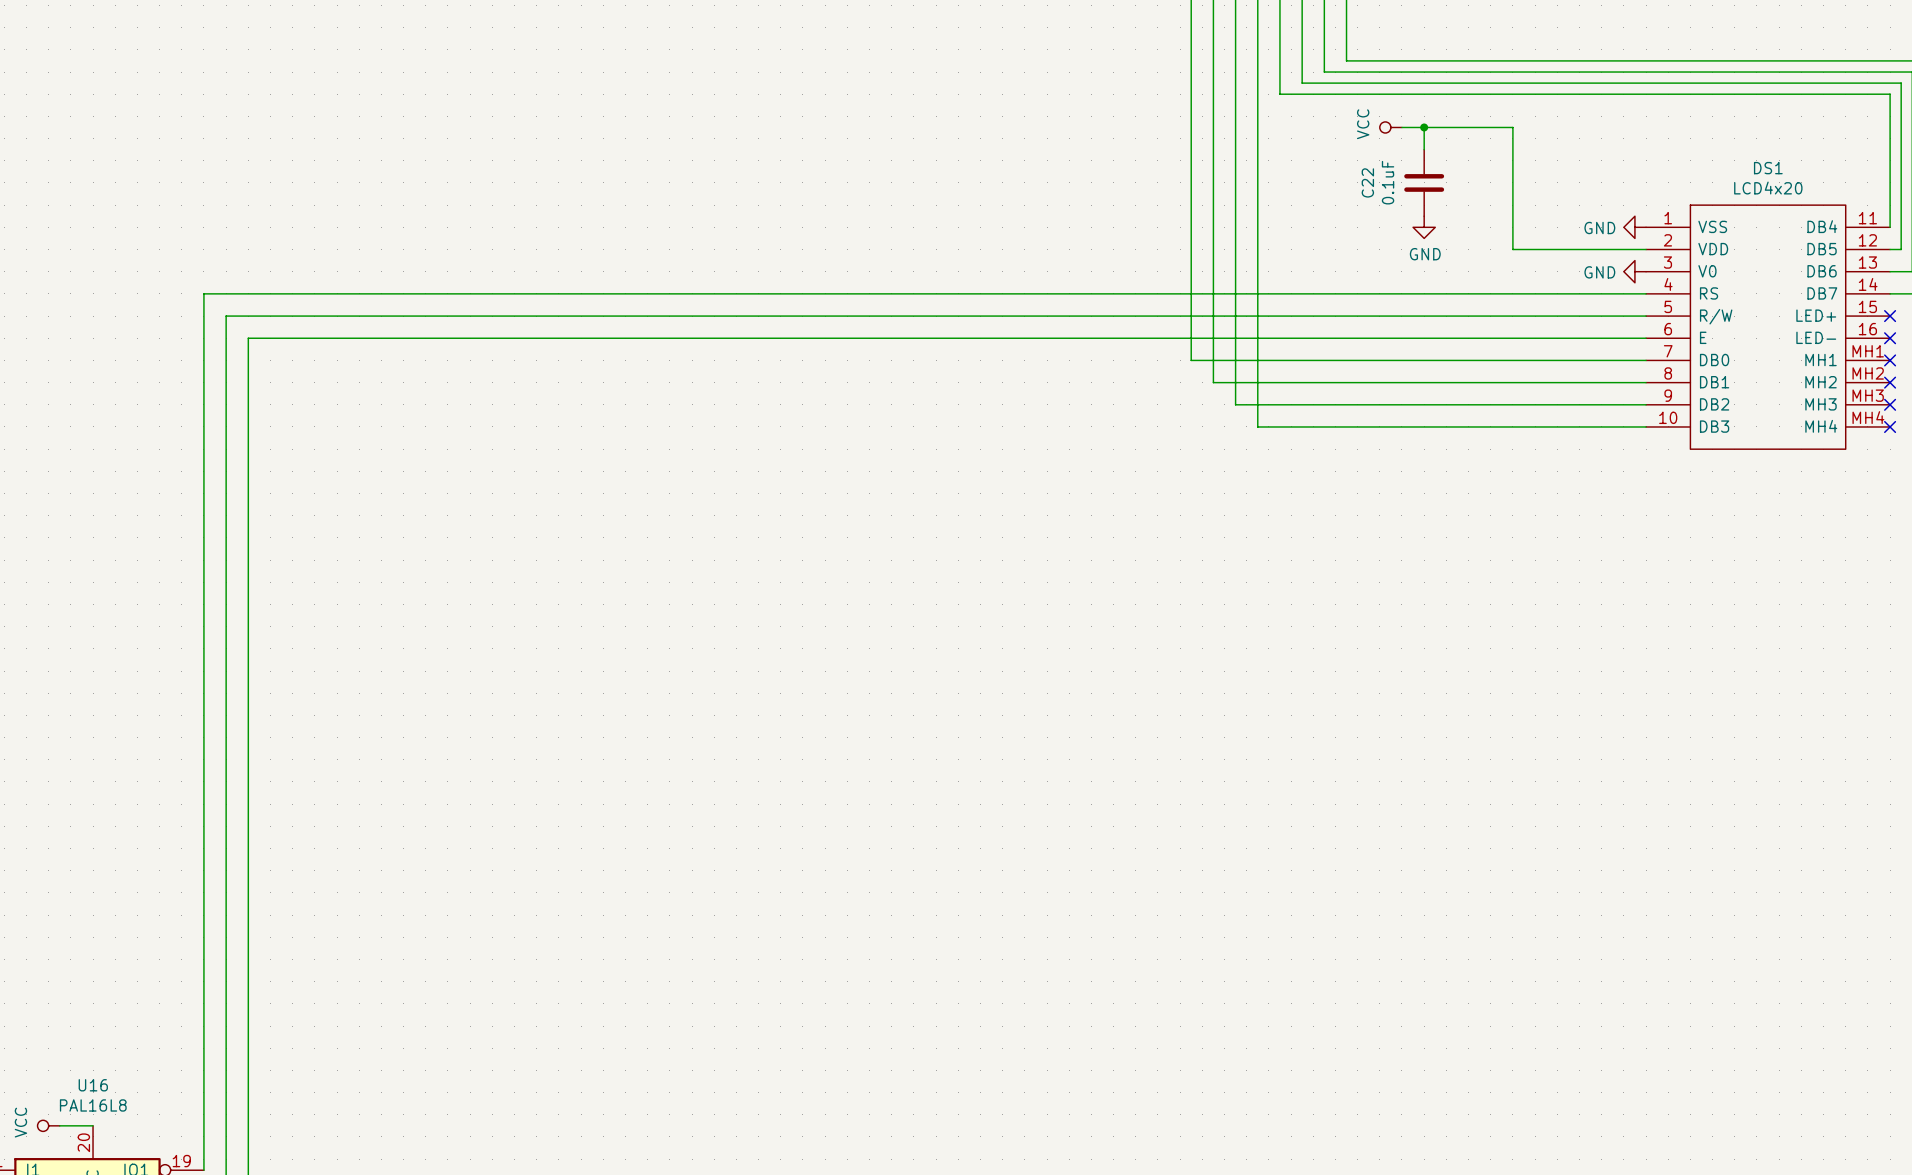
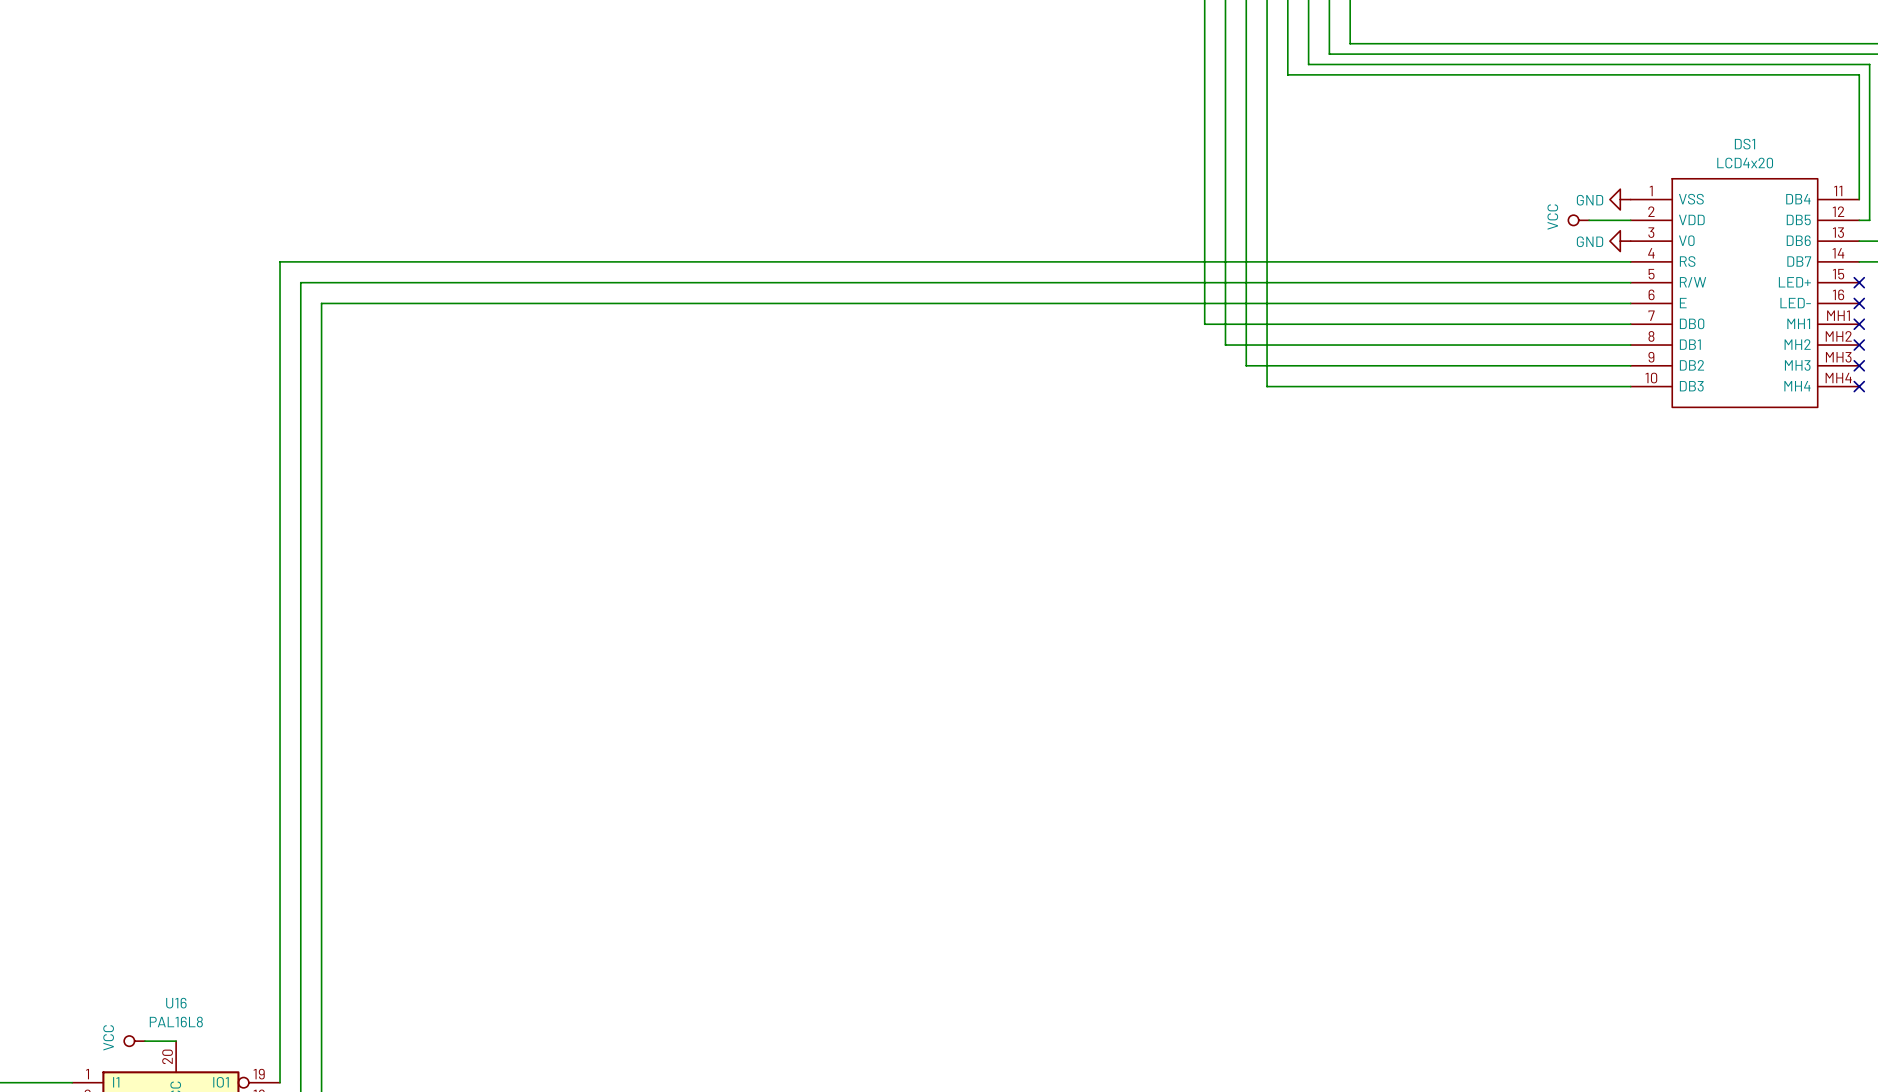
power symbol: VCC (1390, 127) -> none
wire: (1401, 127) (1512, 127) (1512, 249) (1601, 249) -> none
wire: (1424, 127) (1424, 149) -> none
junction: (1424, 127) -> none
C22: 0.1uF (1424, 182) -> none
power symbol: GND (1424, 227) -> none
power symbol: none -> VCC (1578, 220)

